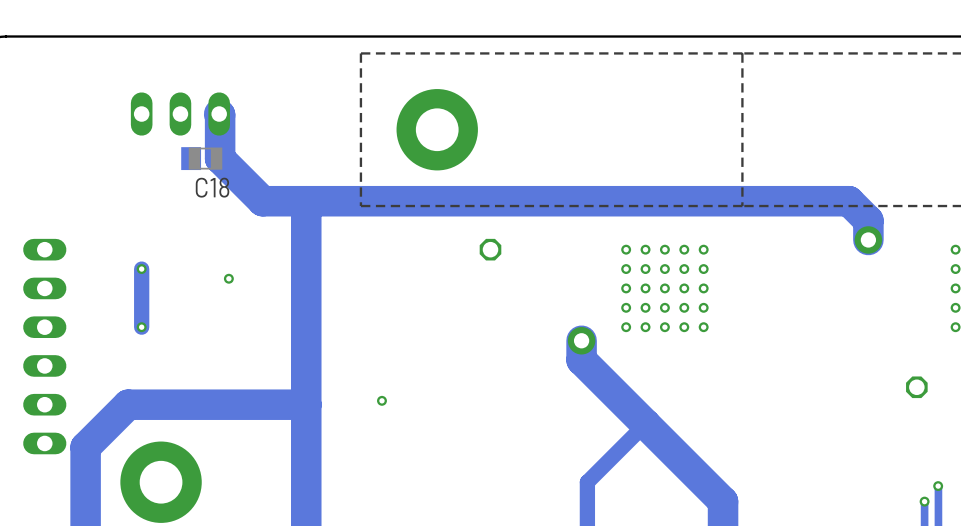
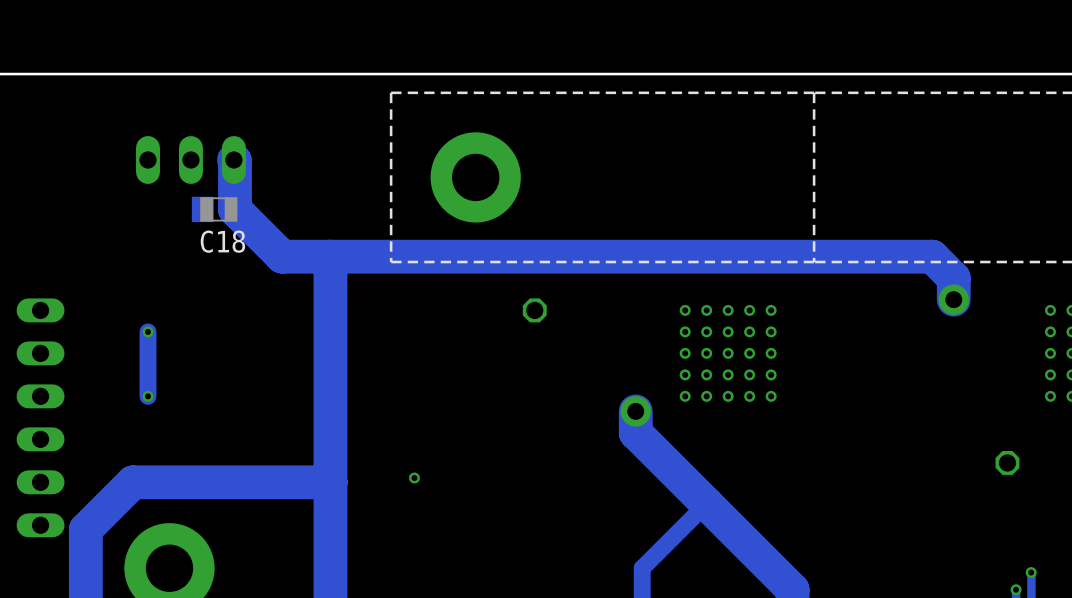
via: (228, 278) -> none

